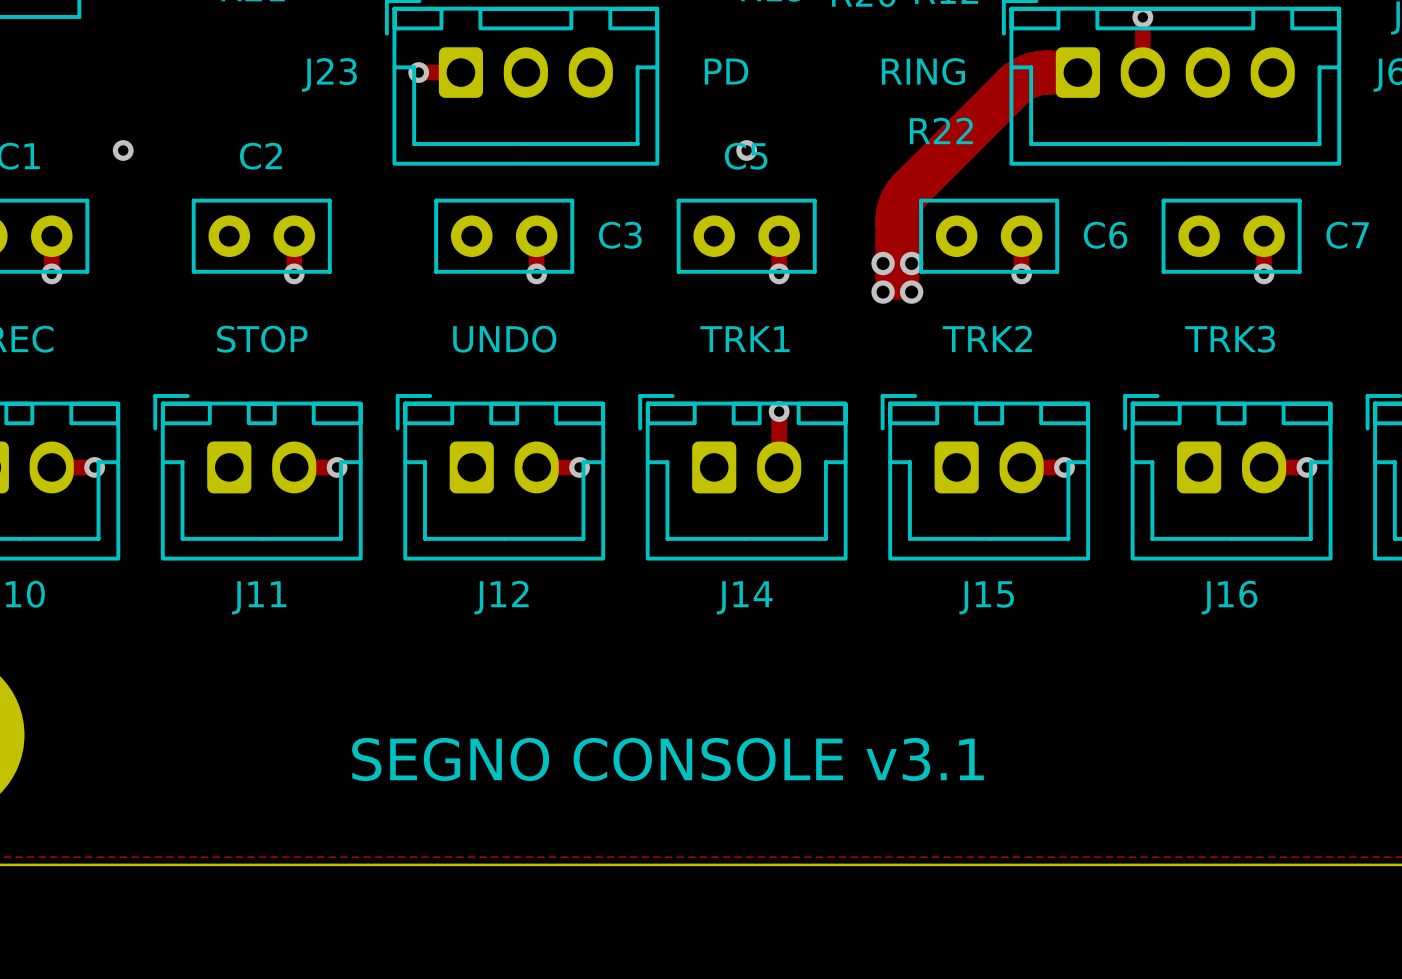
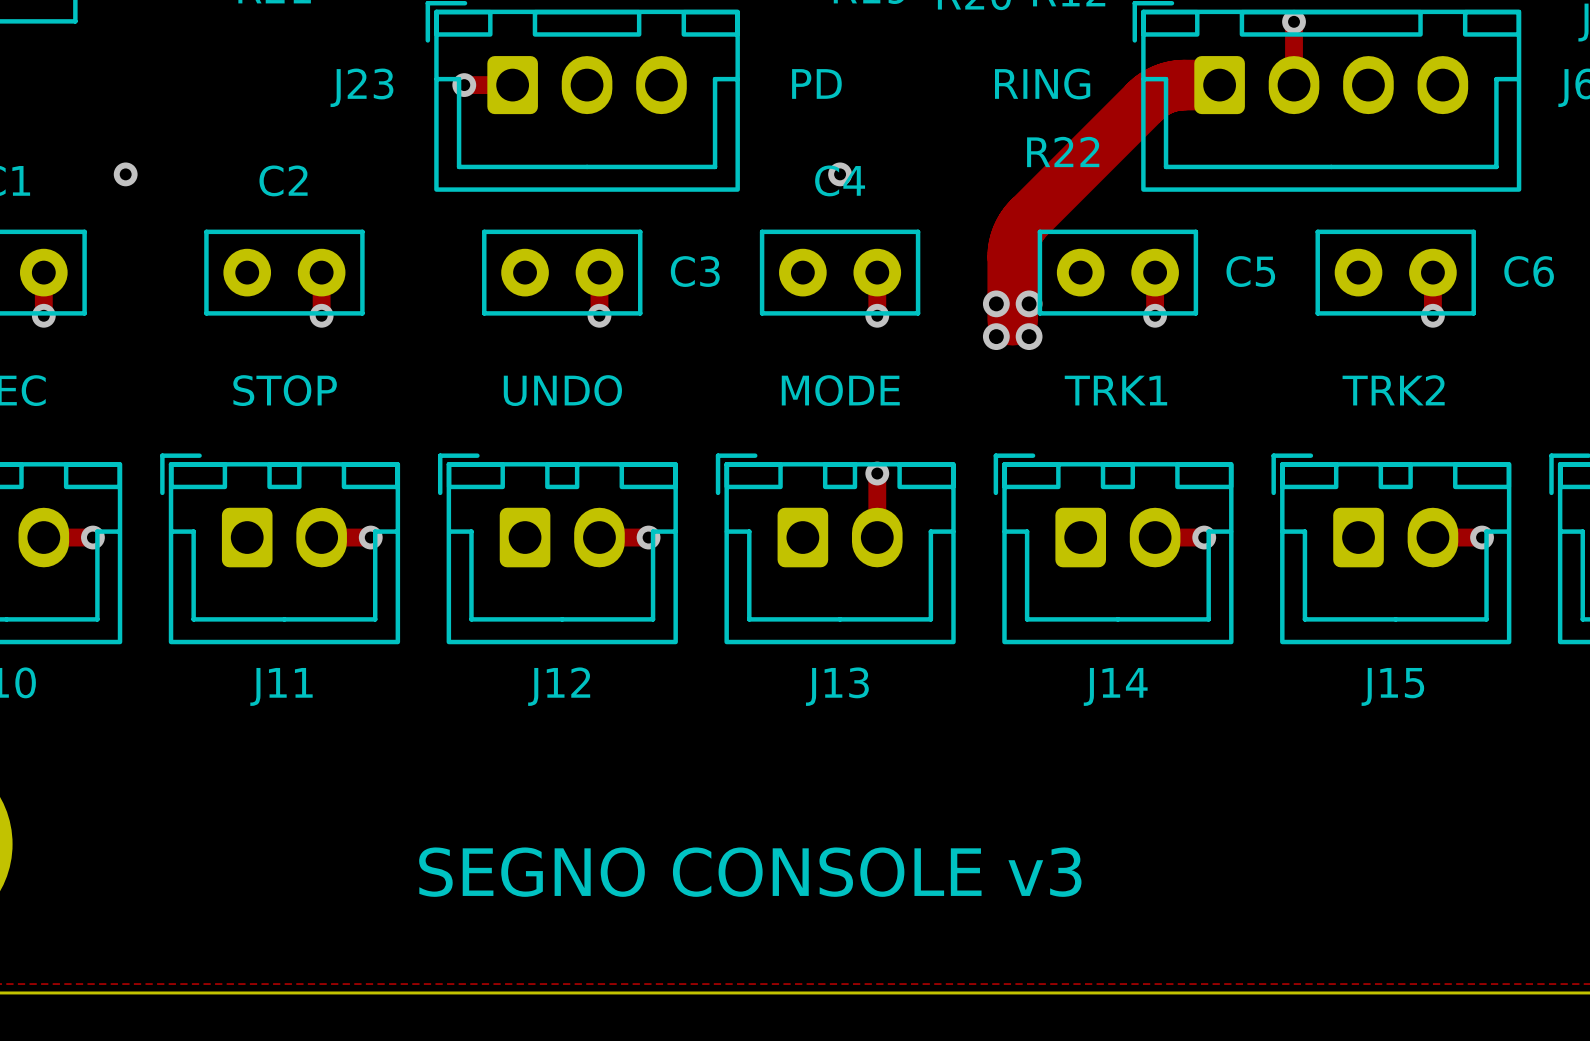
C5 name: C5 (746, 156) -> C4 (840, 180)
C6 name: C6 (1105, 235) -> C5 (1250, 271)
C7 name: C7 (1347, 235) -> C6 (1529, 271)
text: TRK2 (987, 338) -> TRK1 (1115, 390)
text: TRK1 (744, 339) -> MODE (840, 390)
text: TRK3 (1230, 339) -> TRK2 (1393, 390)
J14 name: J14 (744, 597) -> J13 (837, 686)
J15 name: J15 (986, 597) -> J14 (1115, 686)
J16 name: J16 (1229, 597) -> J15 (1392, 686)
text: SEGNO CONSOLE v3.1 (668, 759) -> SEGNO CONSOLE v3 (750, 872)

